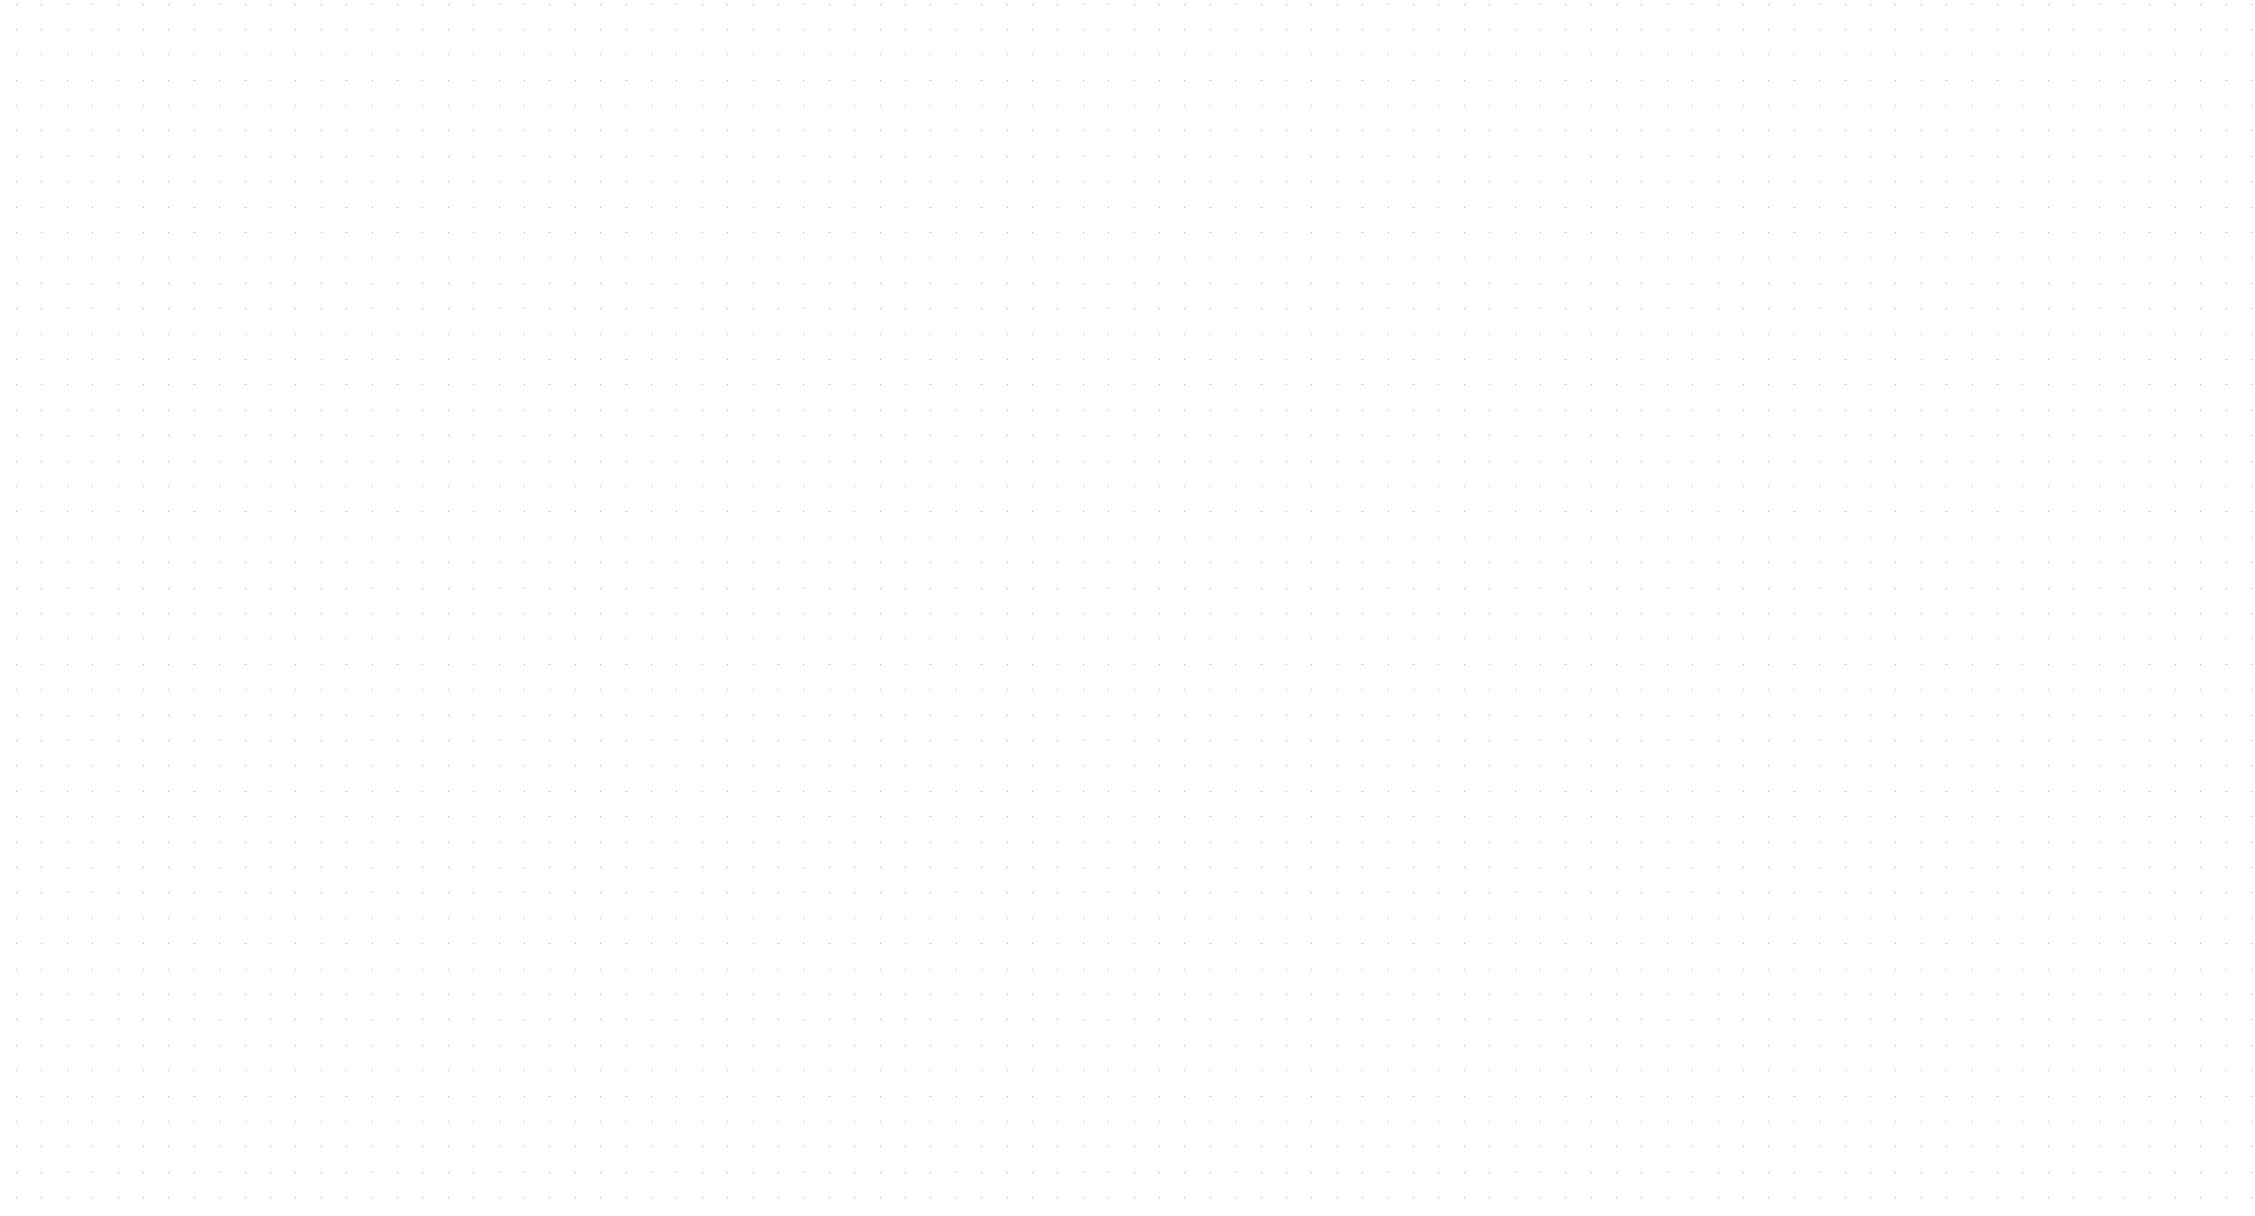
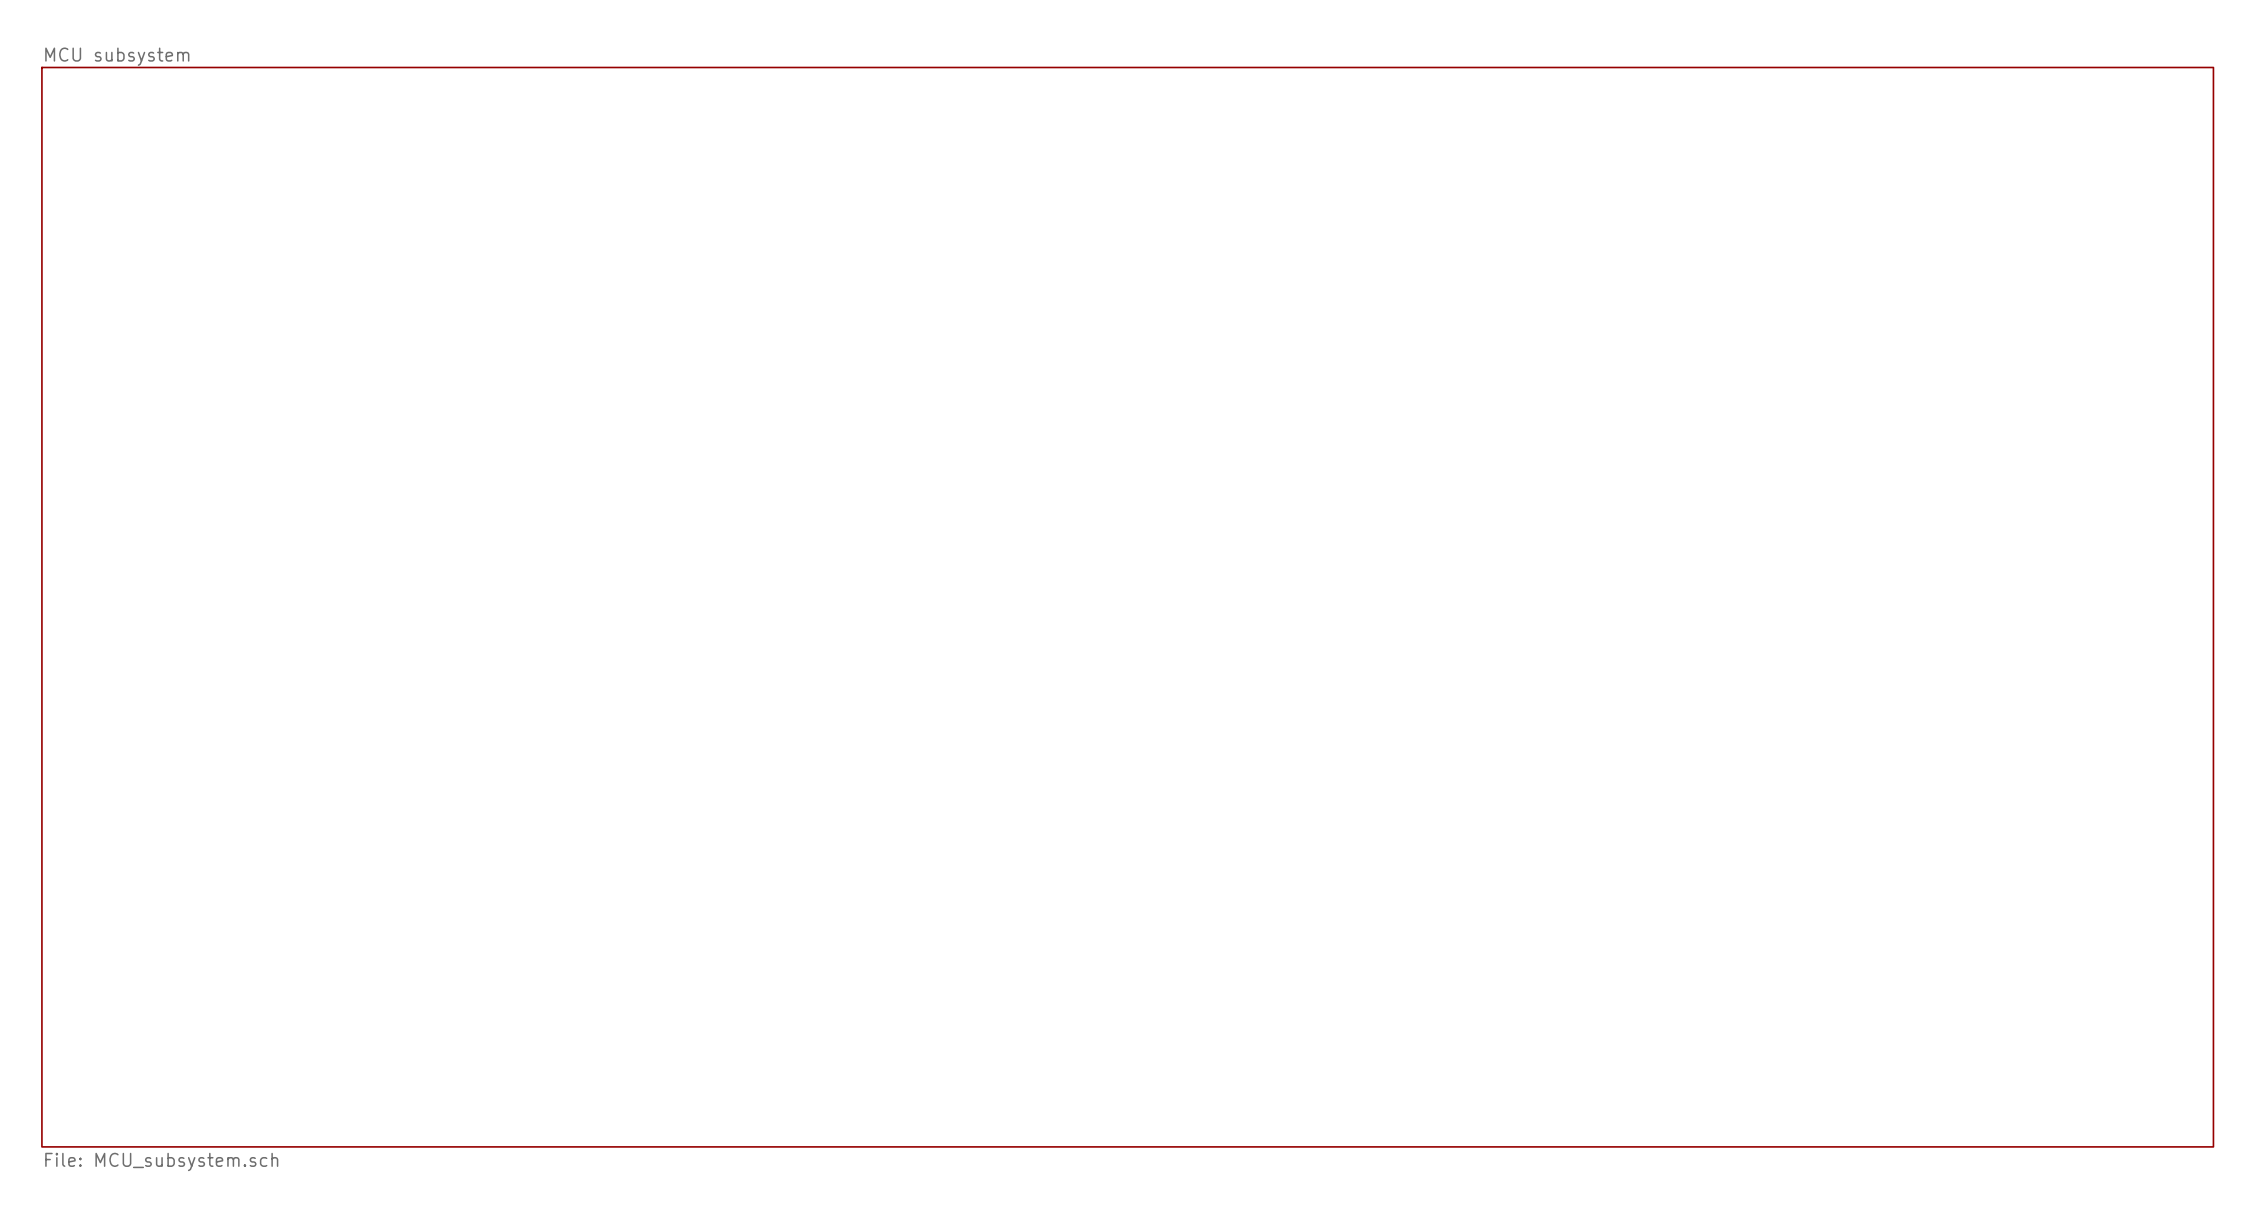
sheet MCU subsystem: none -> File: MCU_subsystem.sch (1127, 607)

